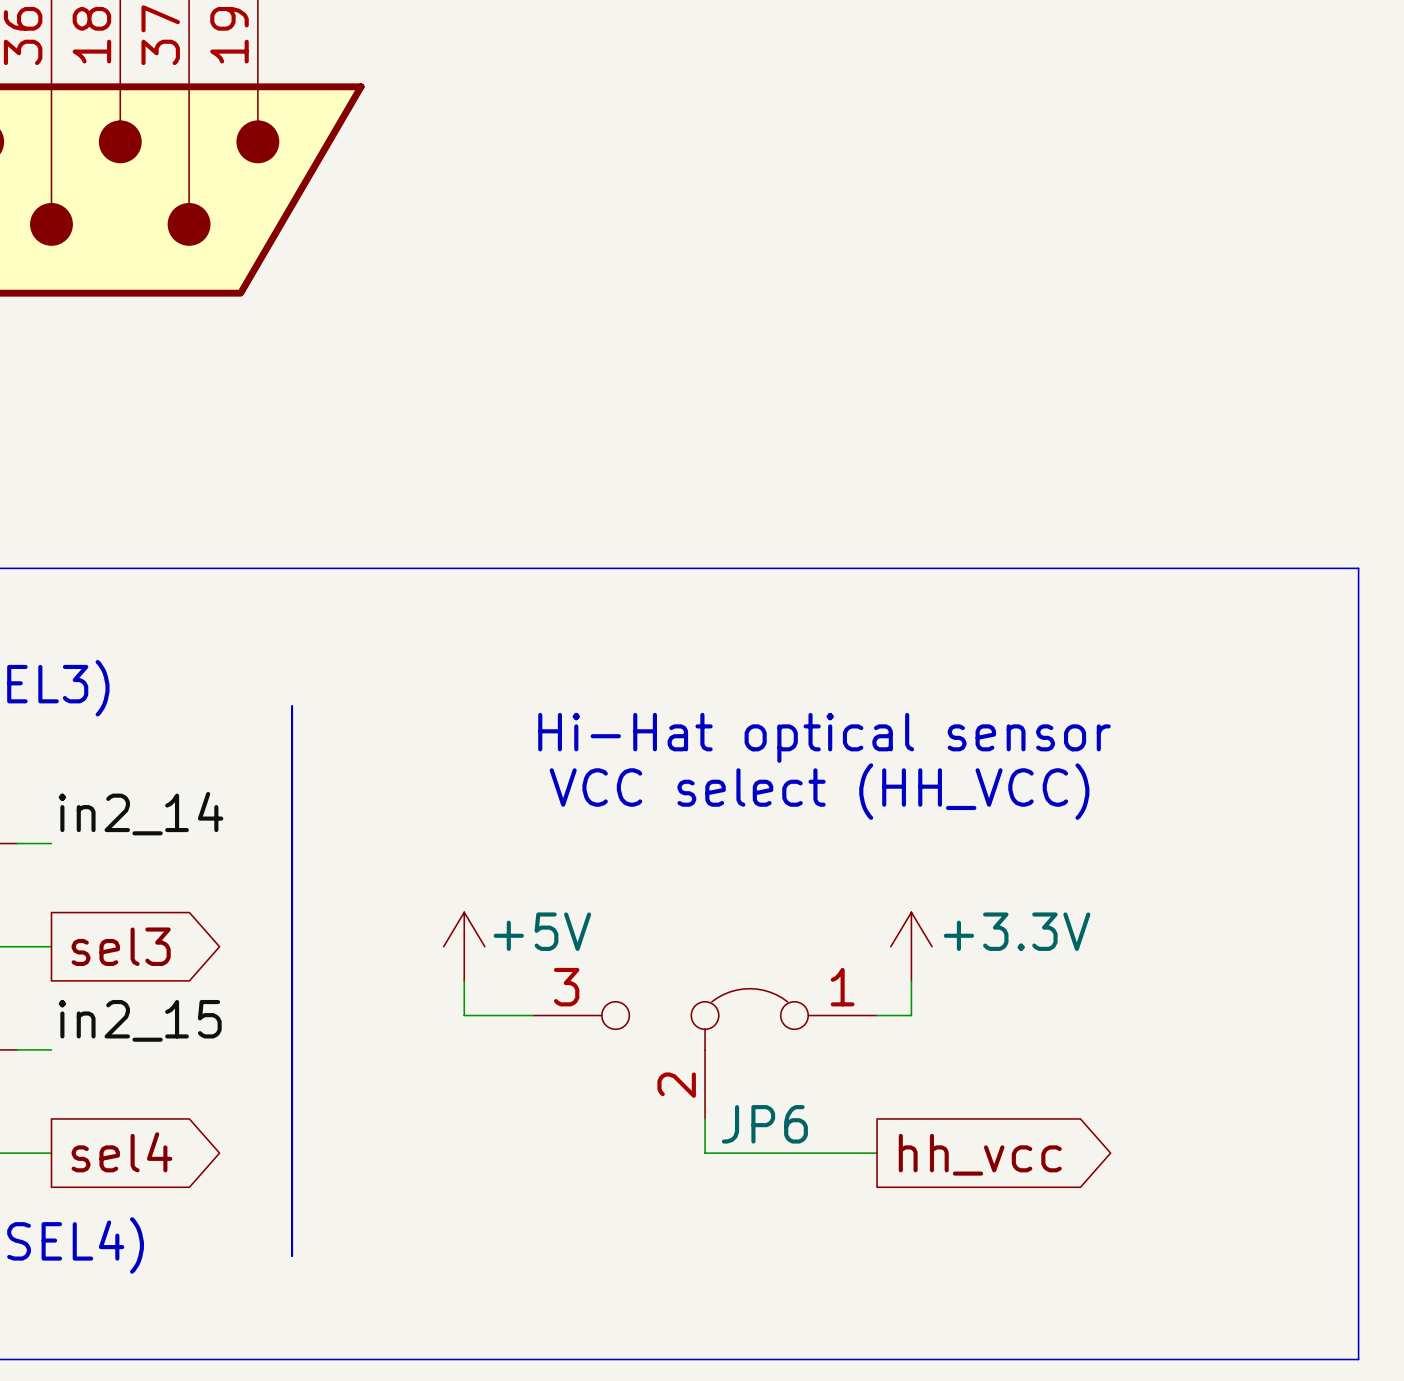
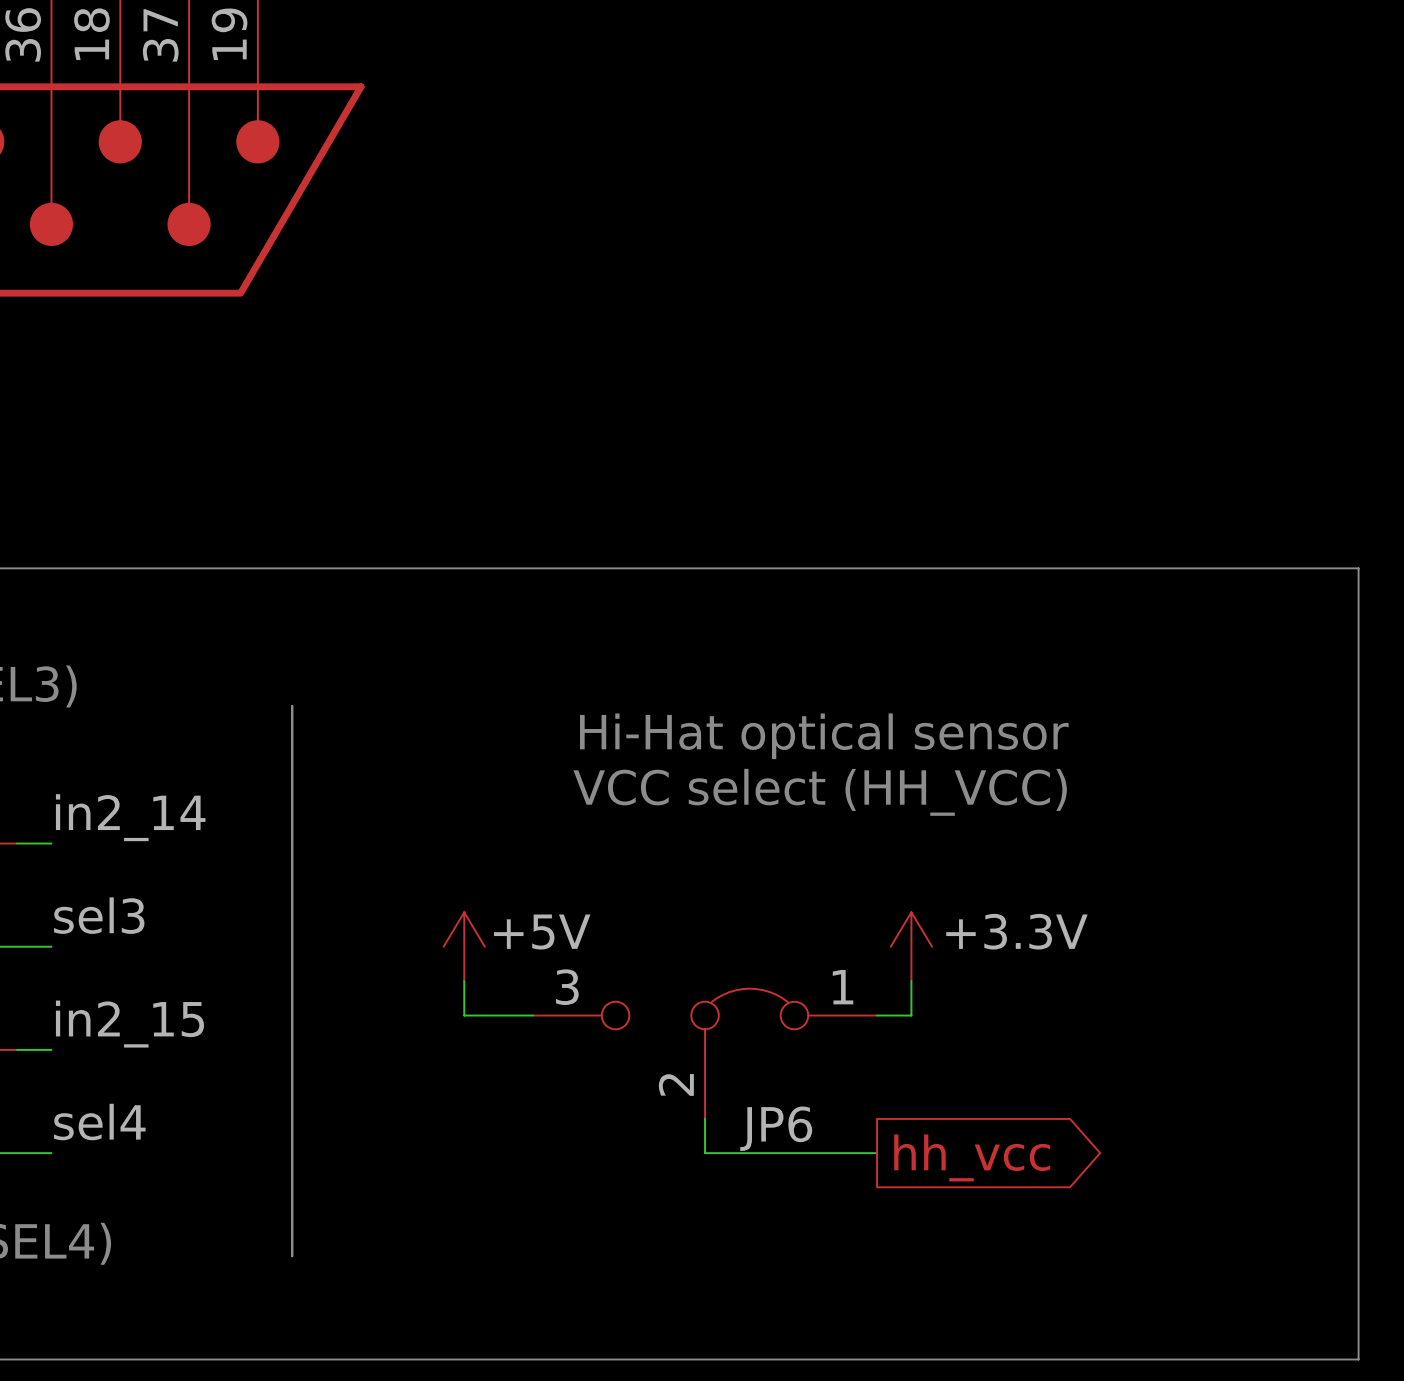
label: none -> sel3 (99, 915)
global label: sel3 (121, 946) -> none
label: none -> sel4 (99, 1122)
global label: sel4 (121, 1152) -> none

